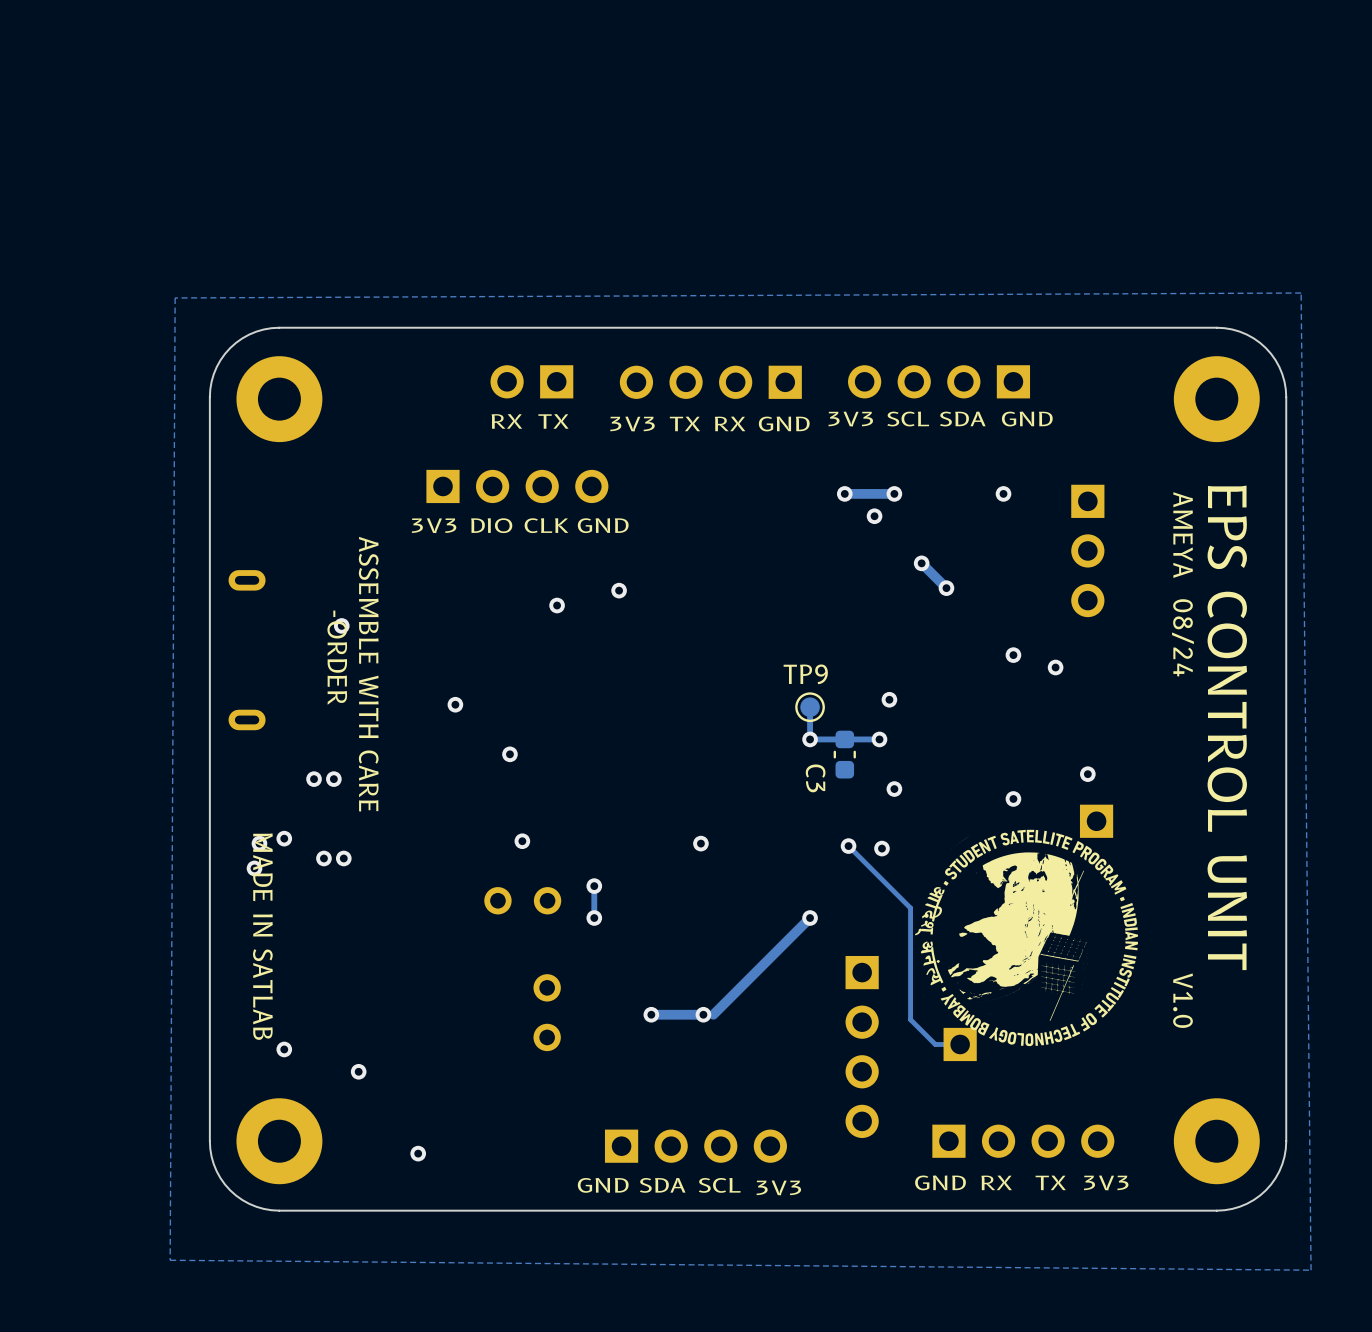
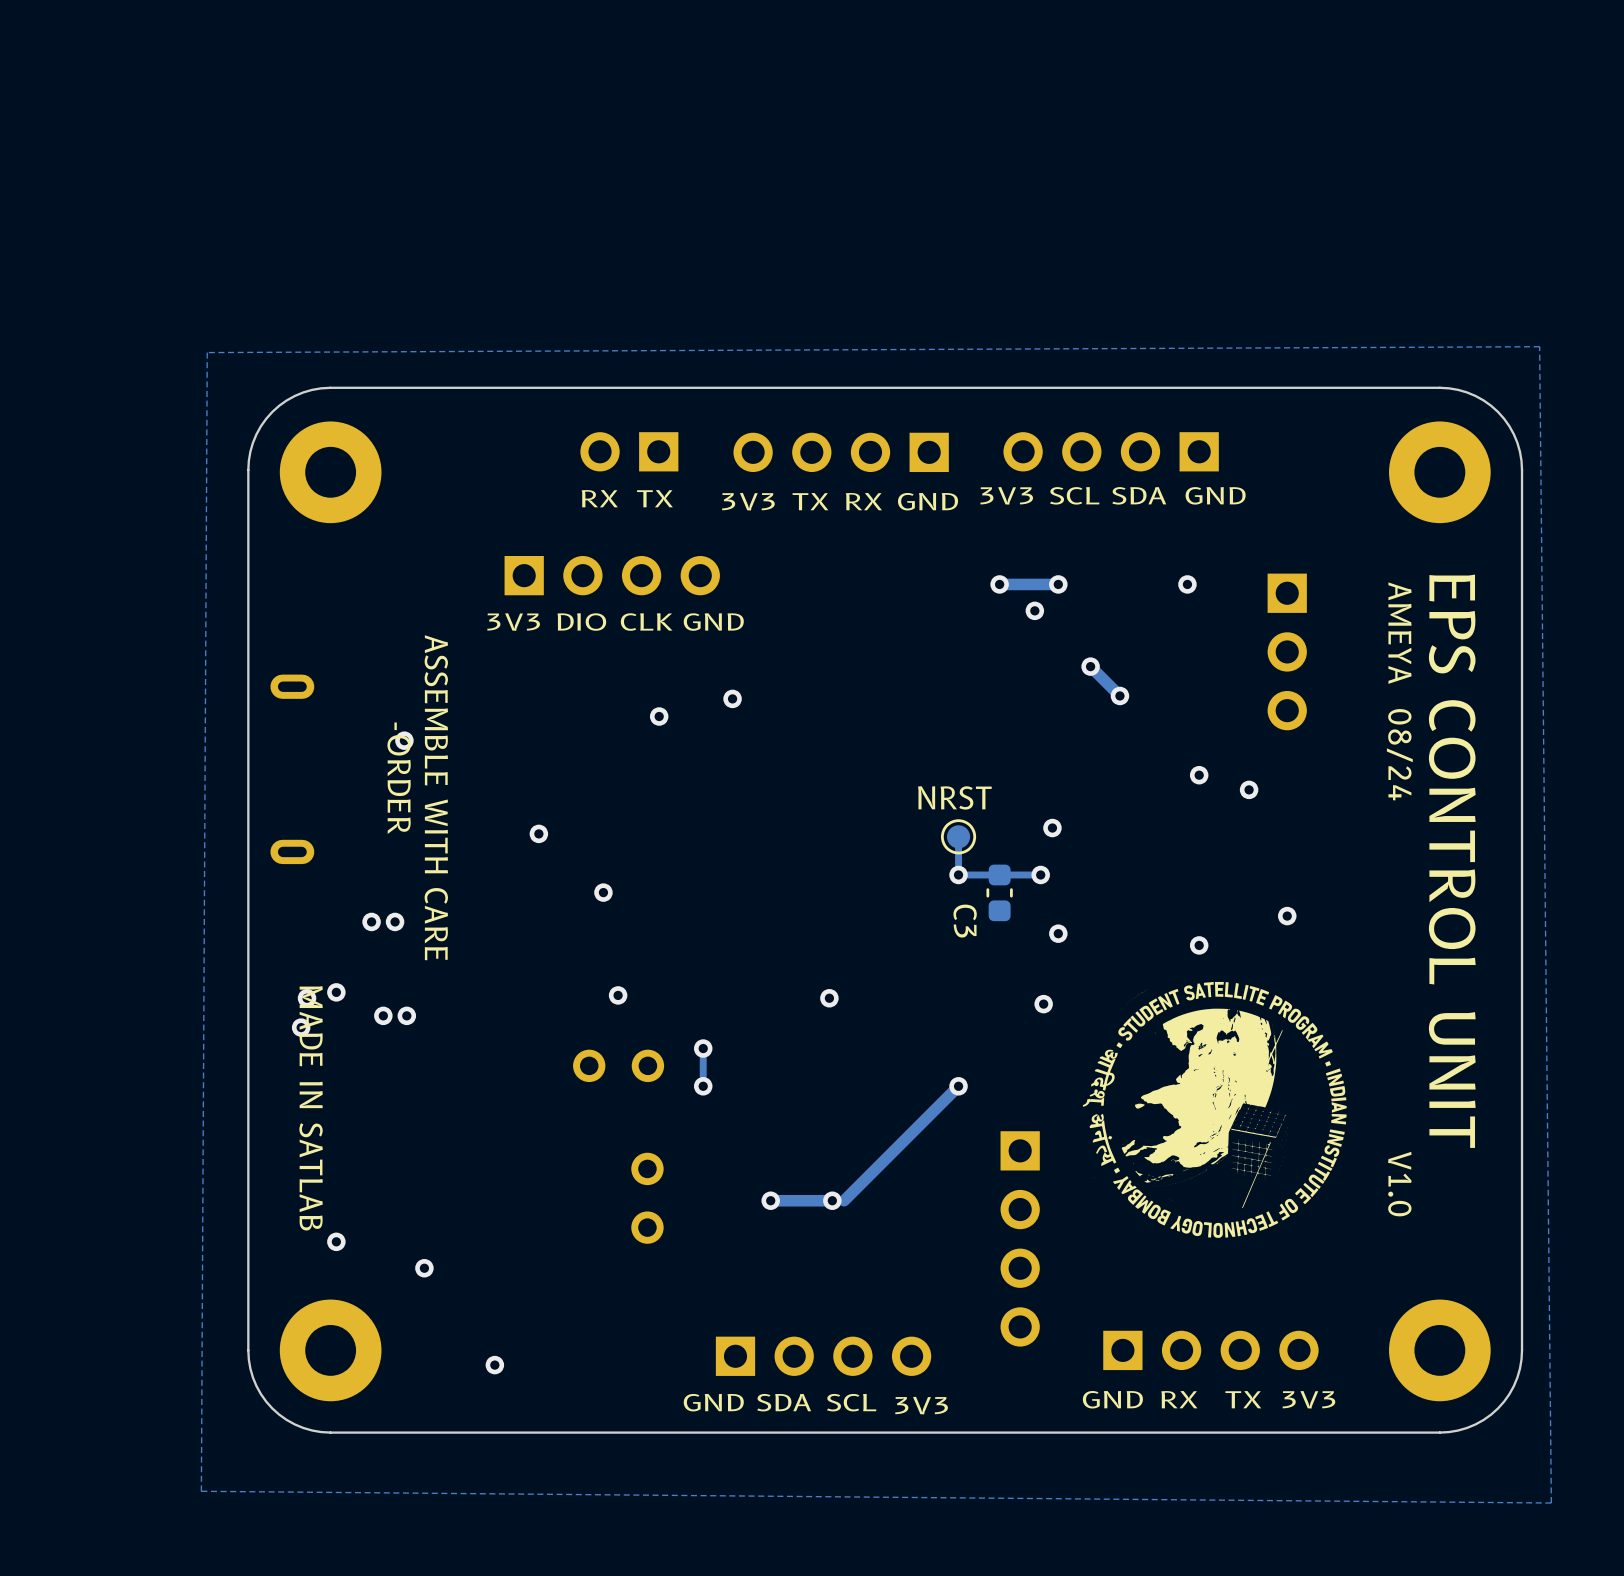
TP9 name: TP9 (805, 674) -> NRST (954, 797)
part: (1096, 821) -> none
track: (848, 846) (910, 908) (910, 1019) (935, 1044) (960, 1044) -> none
via: (848, 846) -> none
part: (960, 1044) -> none

